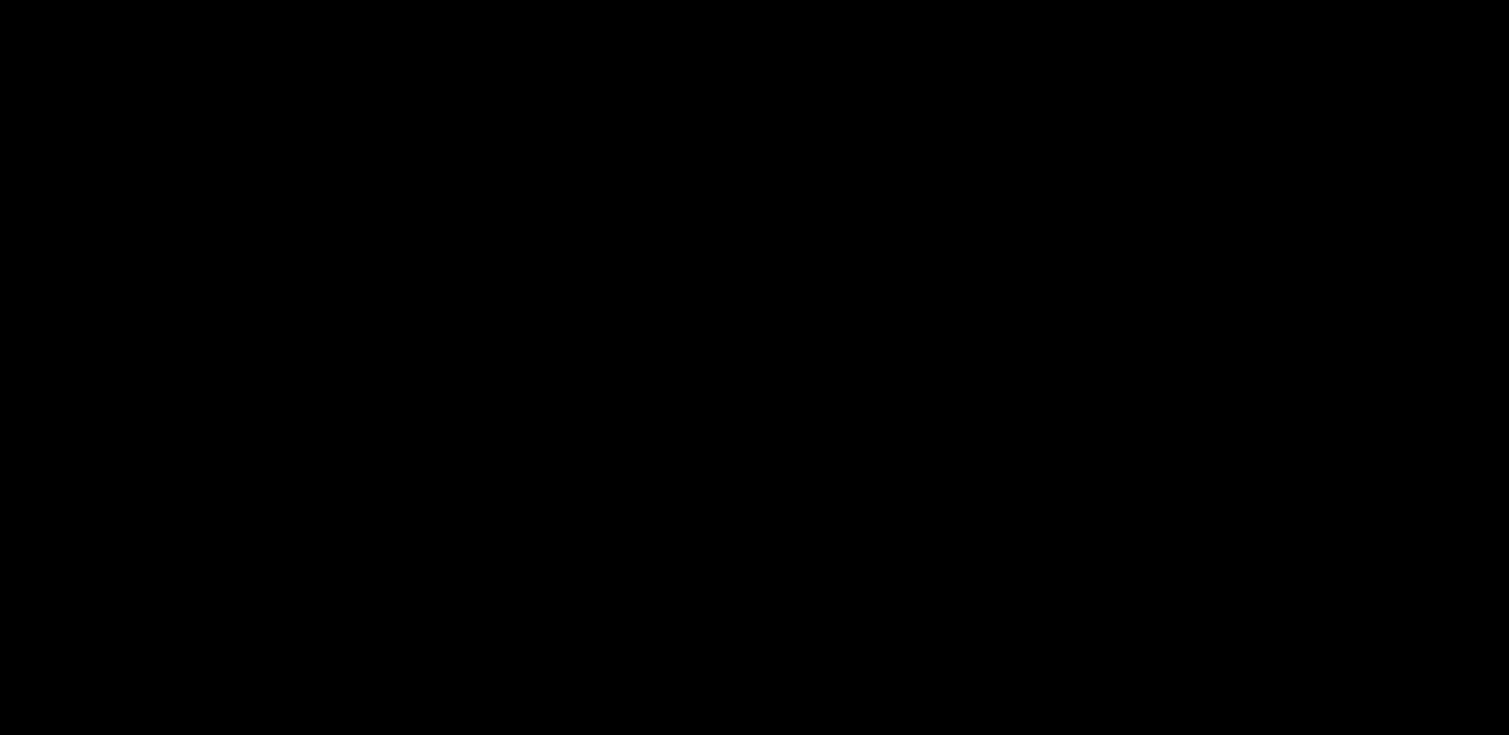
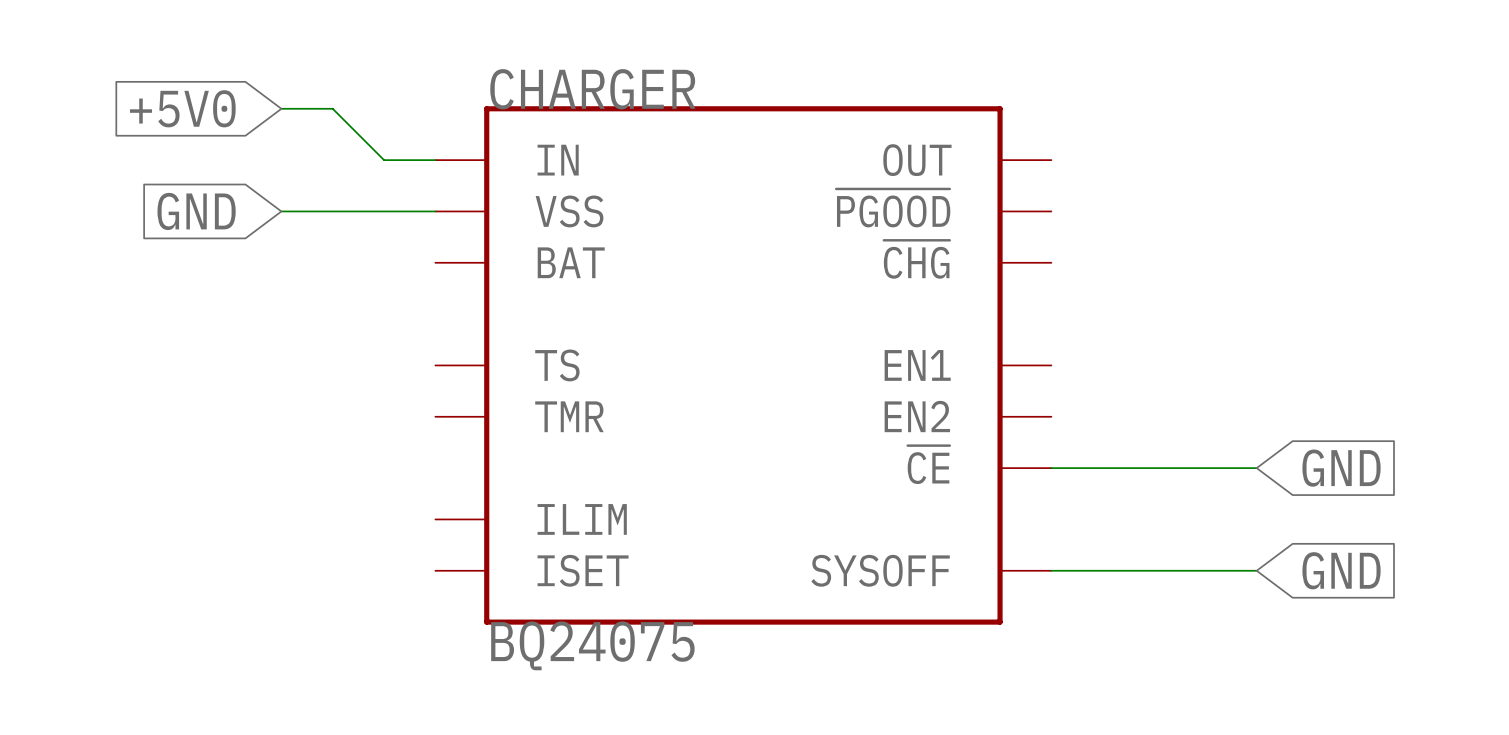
global label: none -> +5V0 (182, 108)
wire: none -> (281, 108) (332, 108) (384, 160) (435, 160)
global label: none -> GND (196, 211)
wire: none -> (281, 211) (435, 211)
CHARGER: none -> BQ24075 (743, 365)
wire: none -> (1051, 468) (1256, 468)
global label: none -> GND (1341, 468)
wire: none -> (1051, 570) (1256, 570)
global label: none -> GND (1341, 570)

